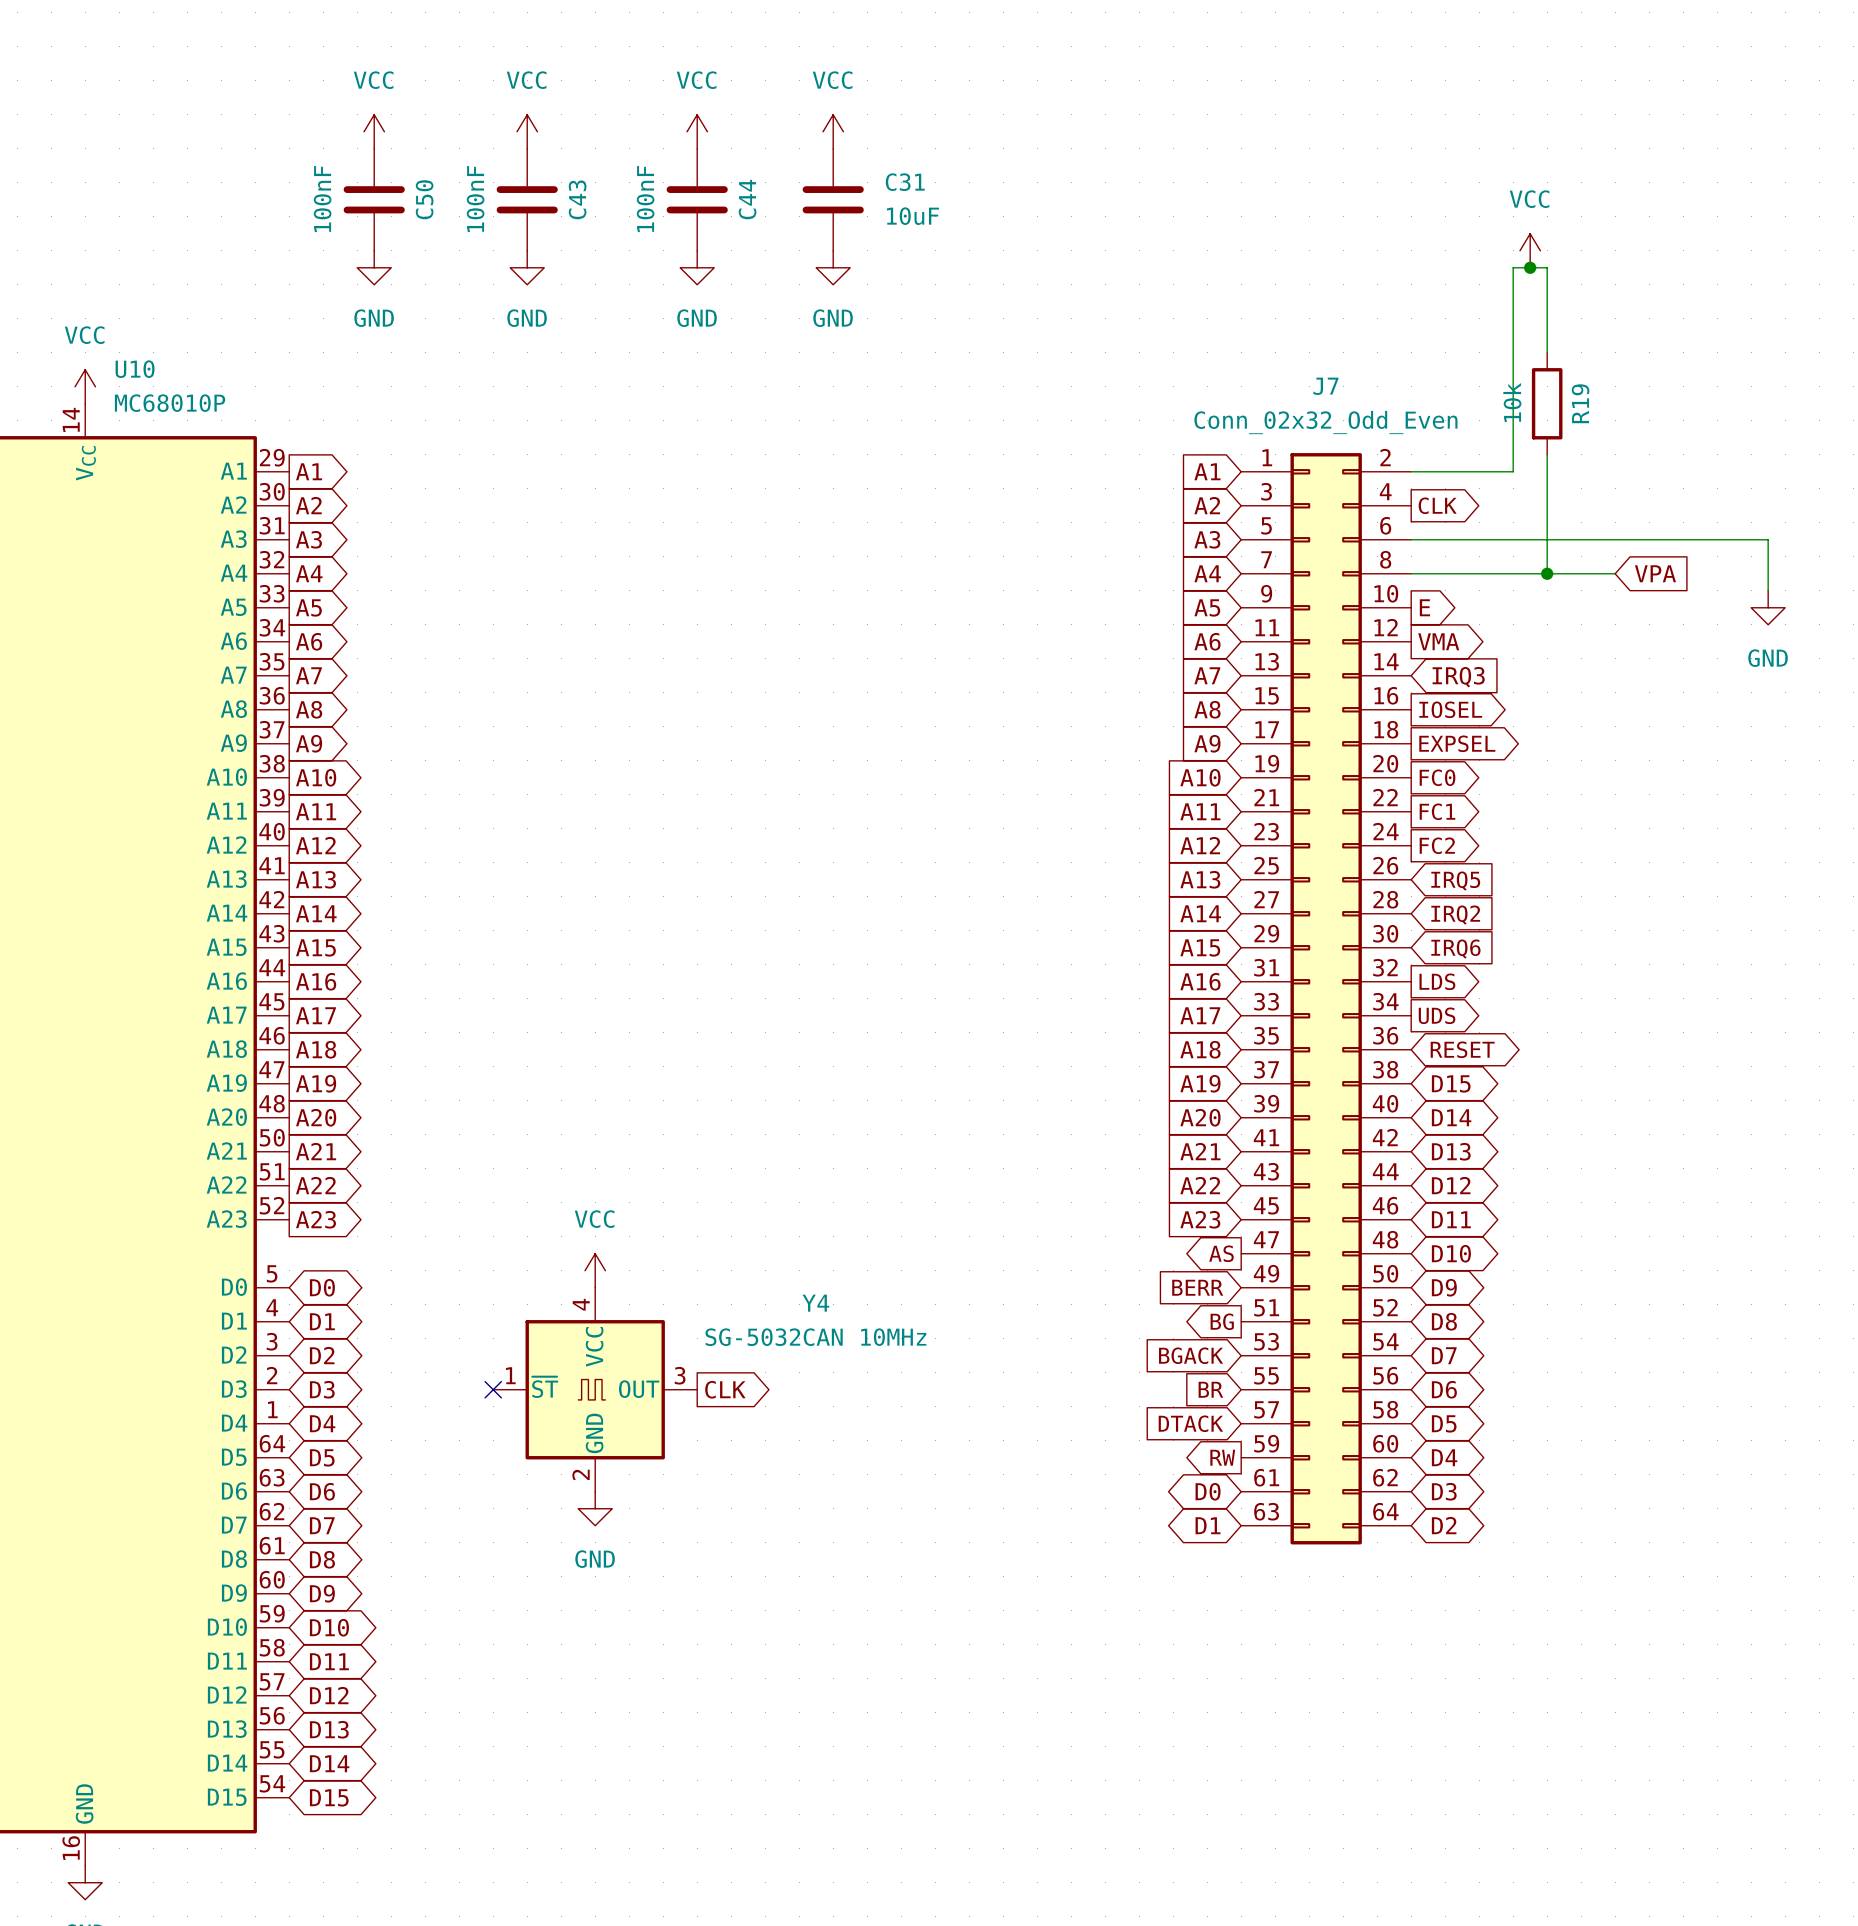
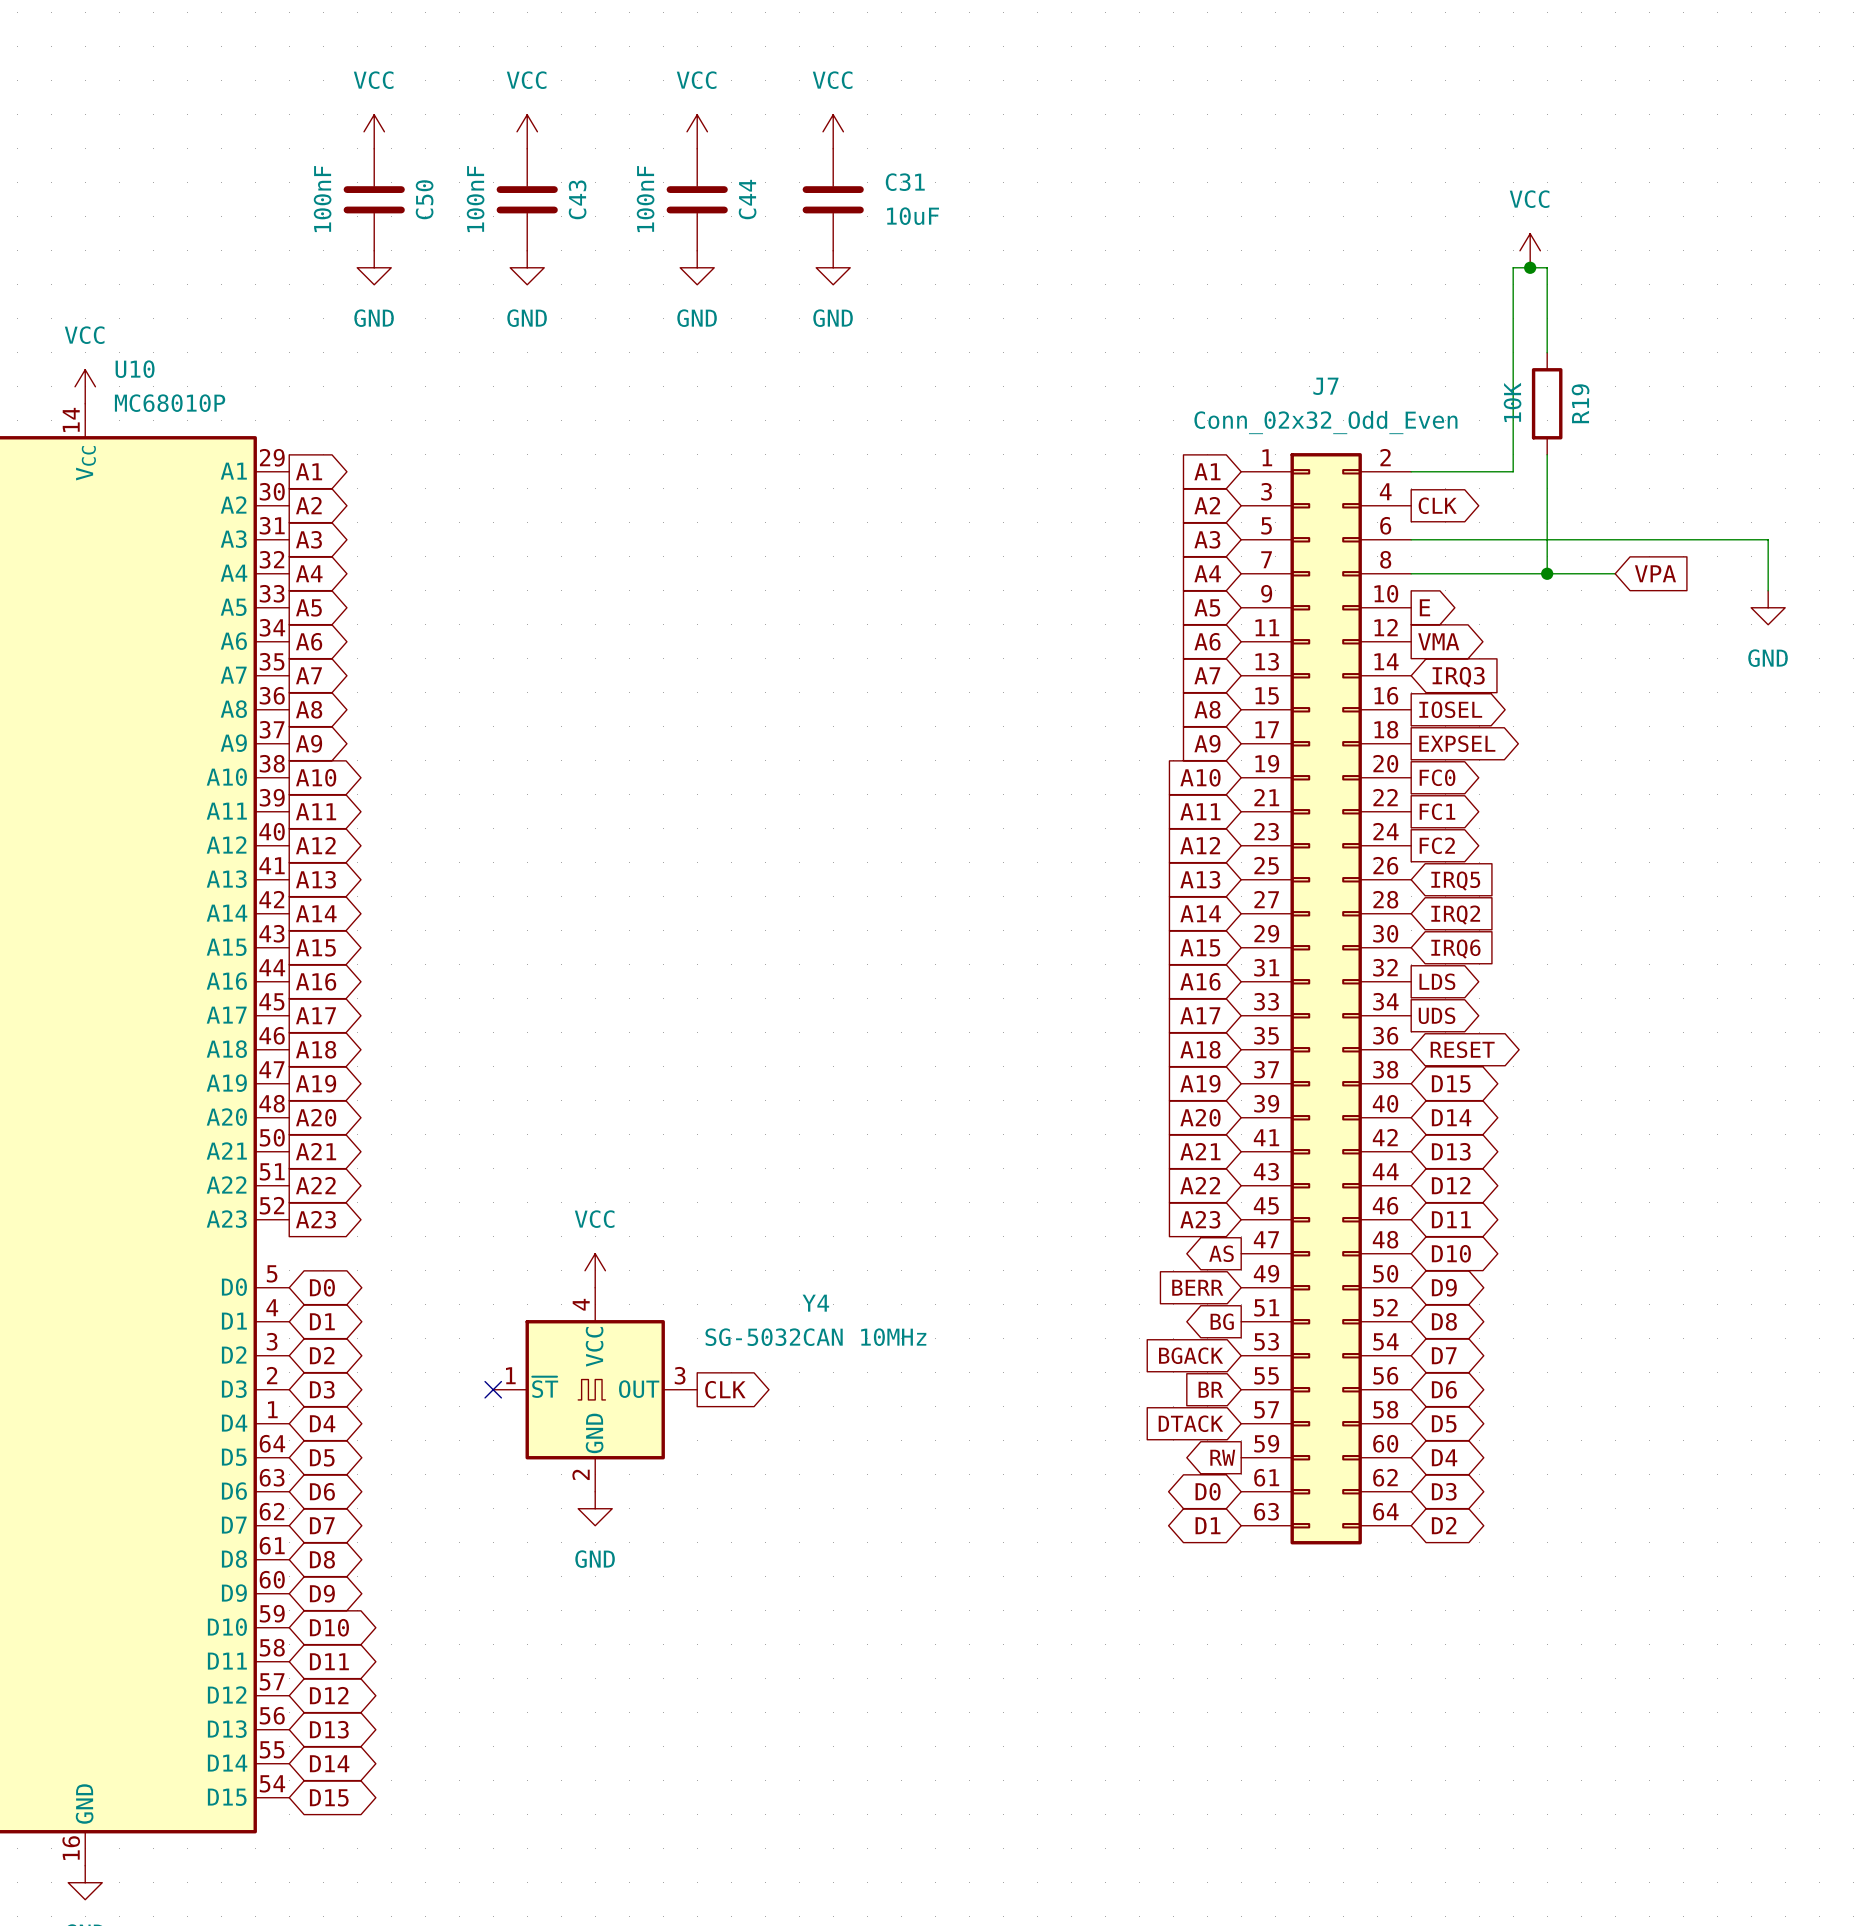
R19 value: 10k (1512, 402) -> 10K (1512, 402)

